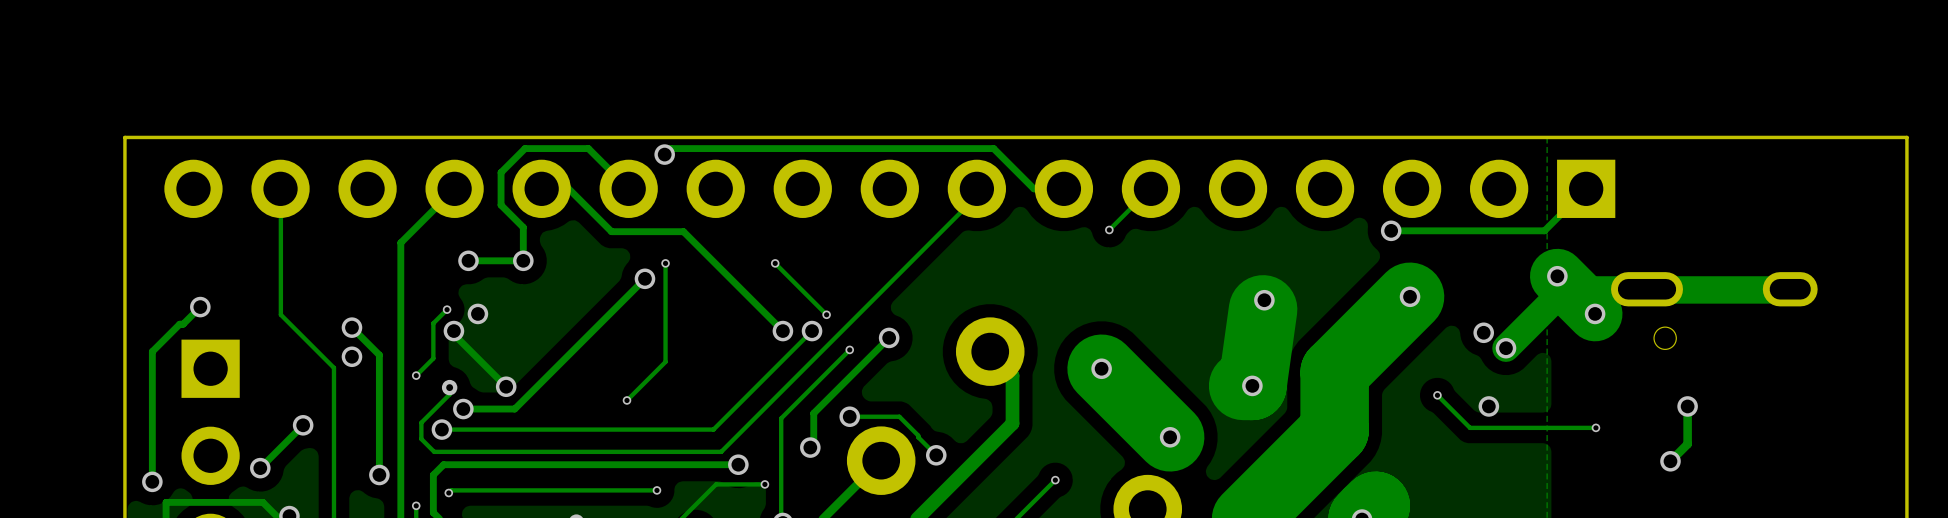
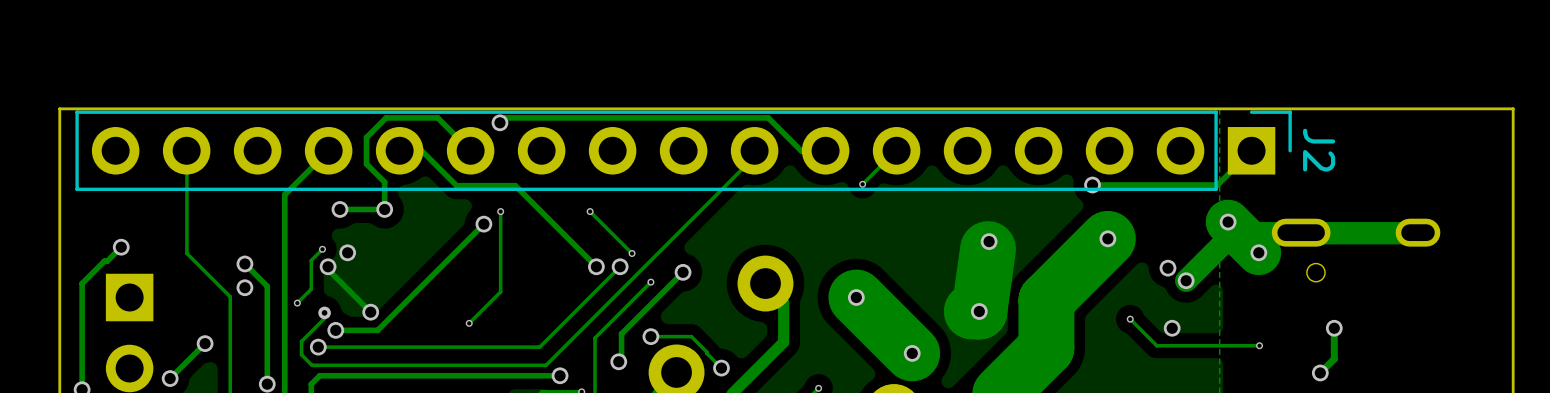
J2 side: top (889, 188) -> bottom (683, 150)

